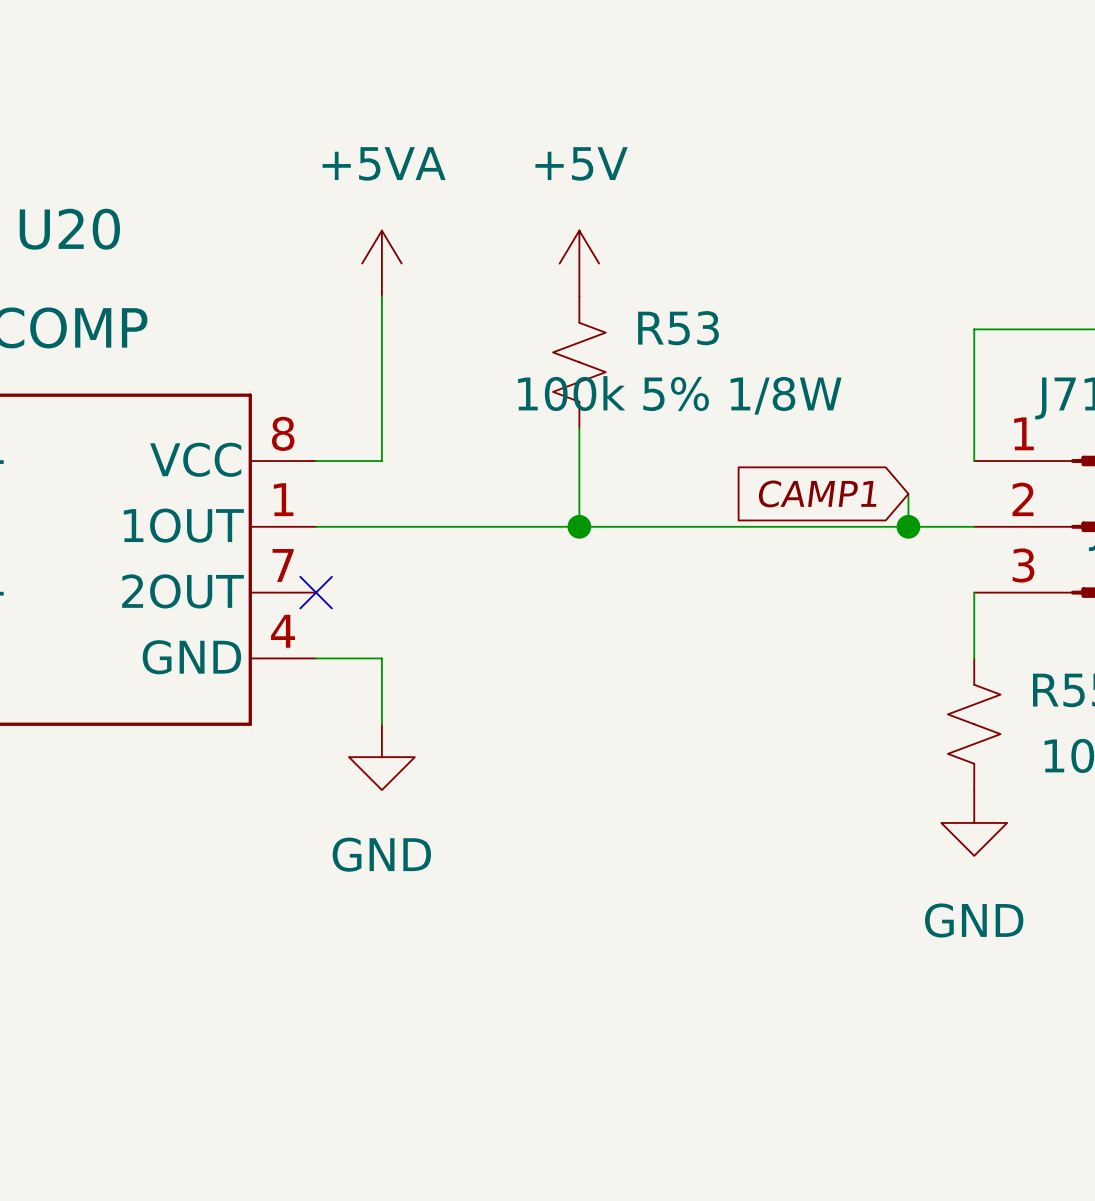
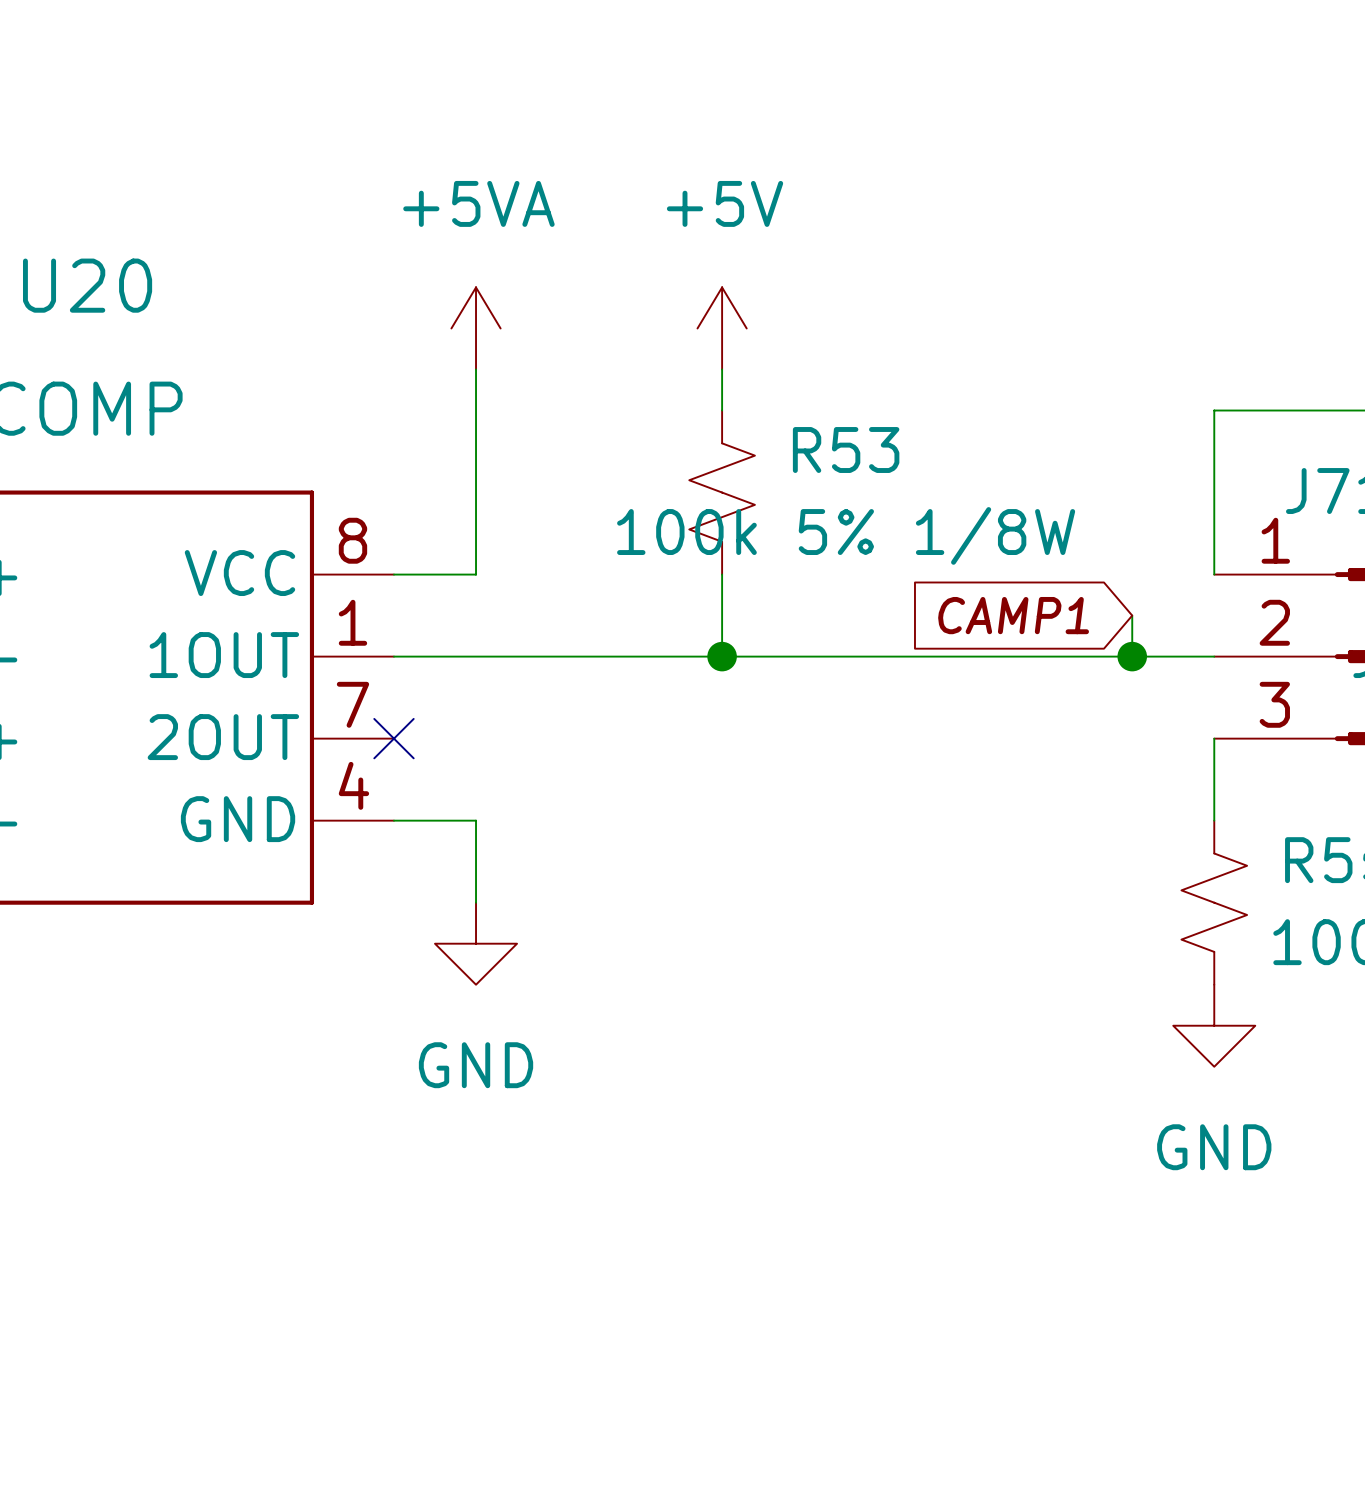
R53 position: (579, 362) -> (722, 492)

